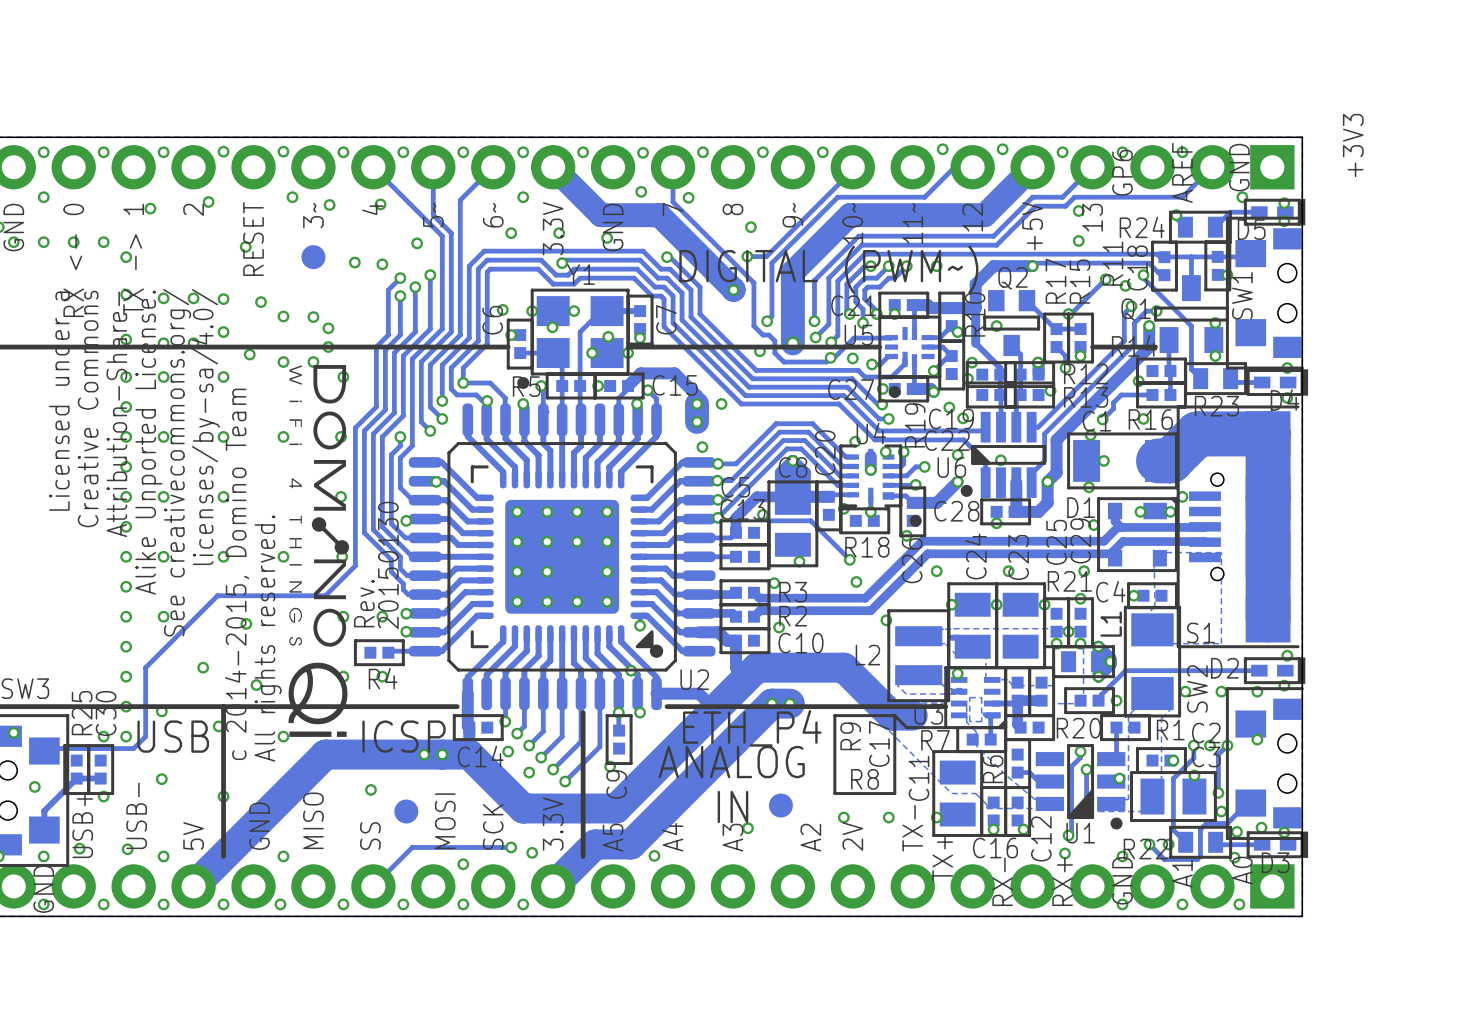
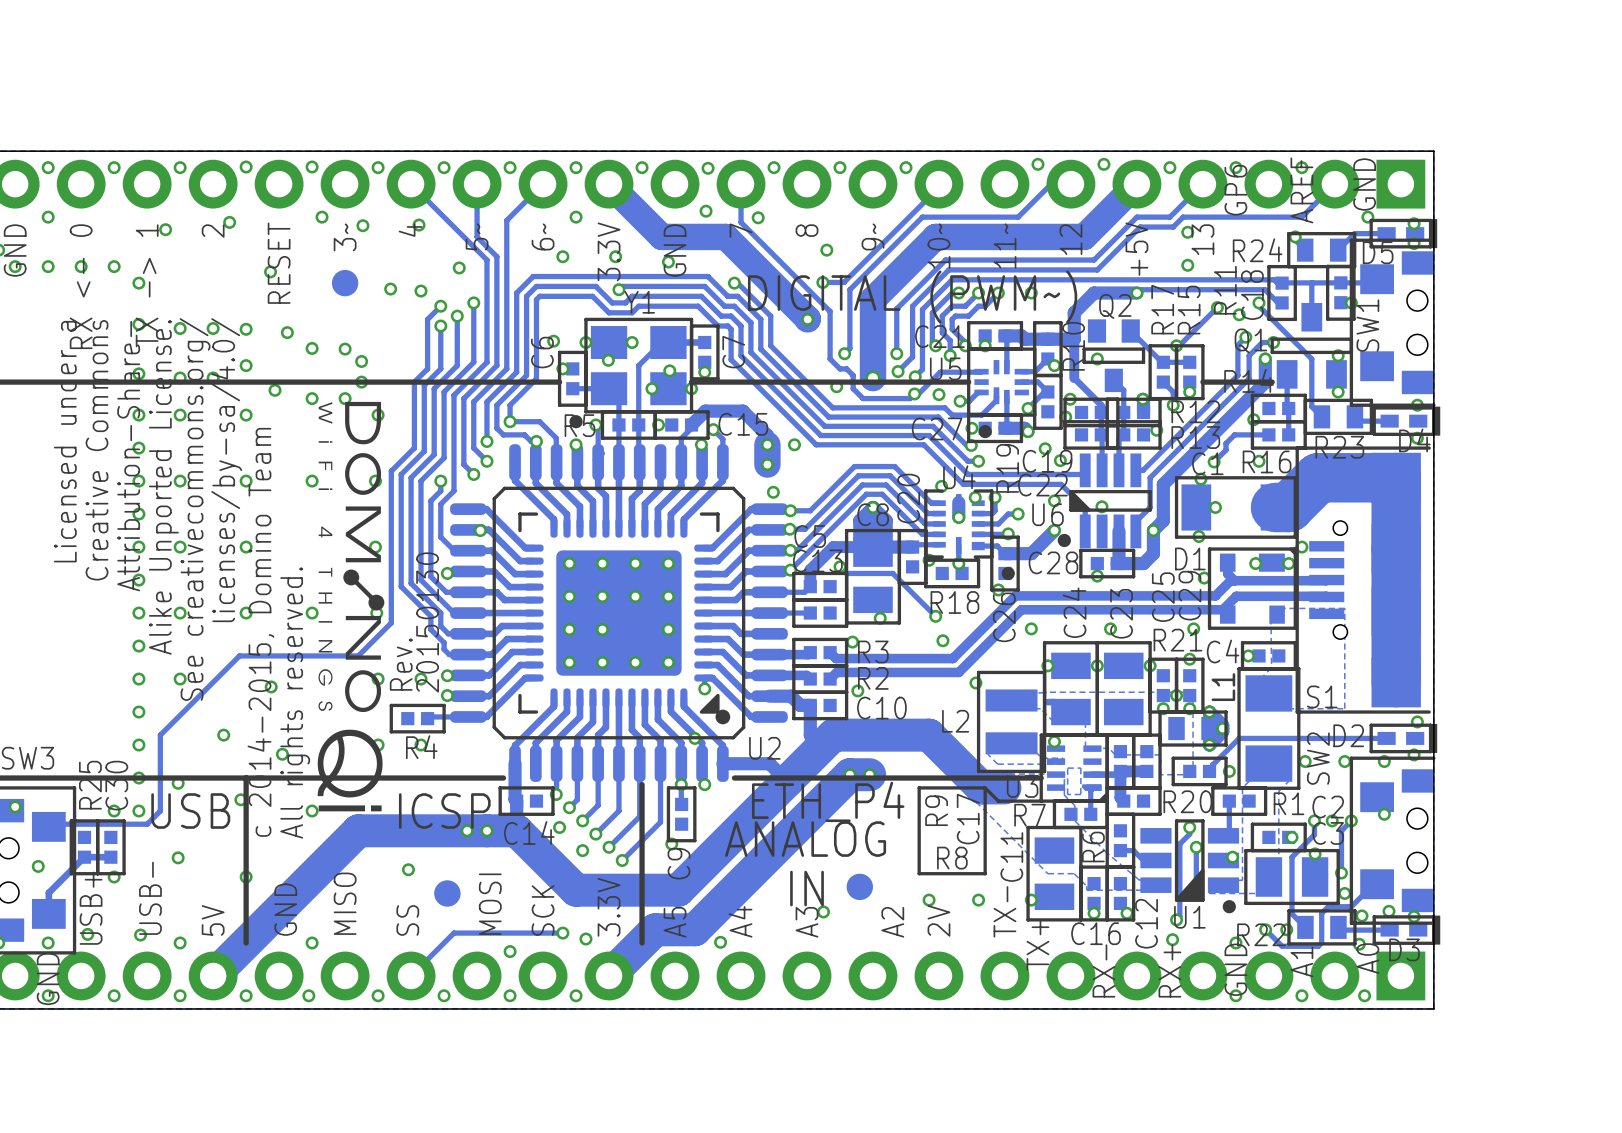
text: +3V3 (1353, 145) -> none

